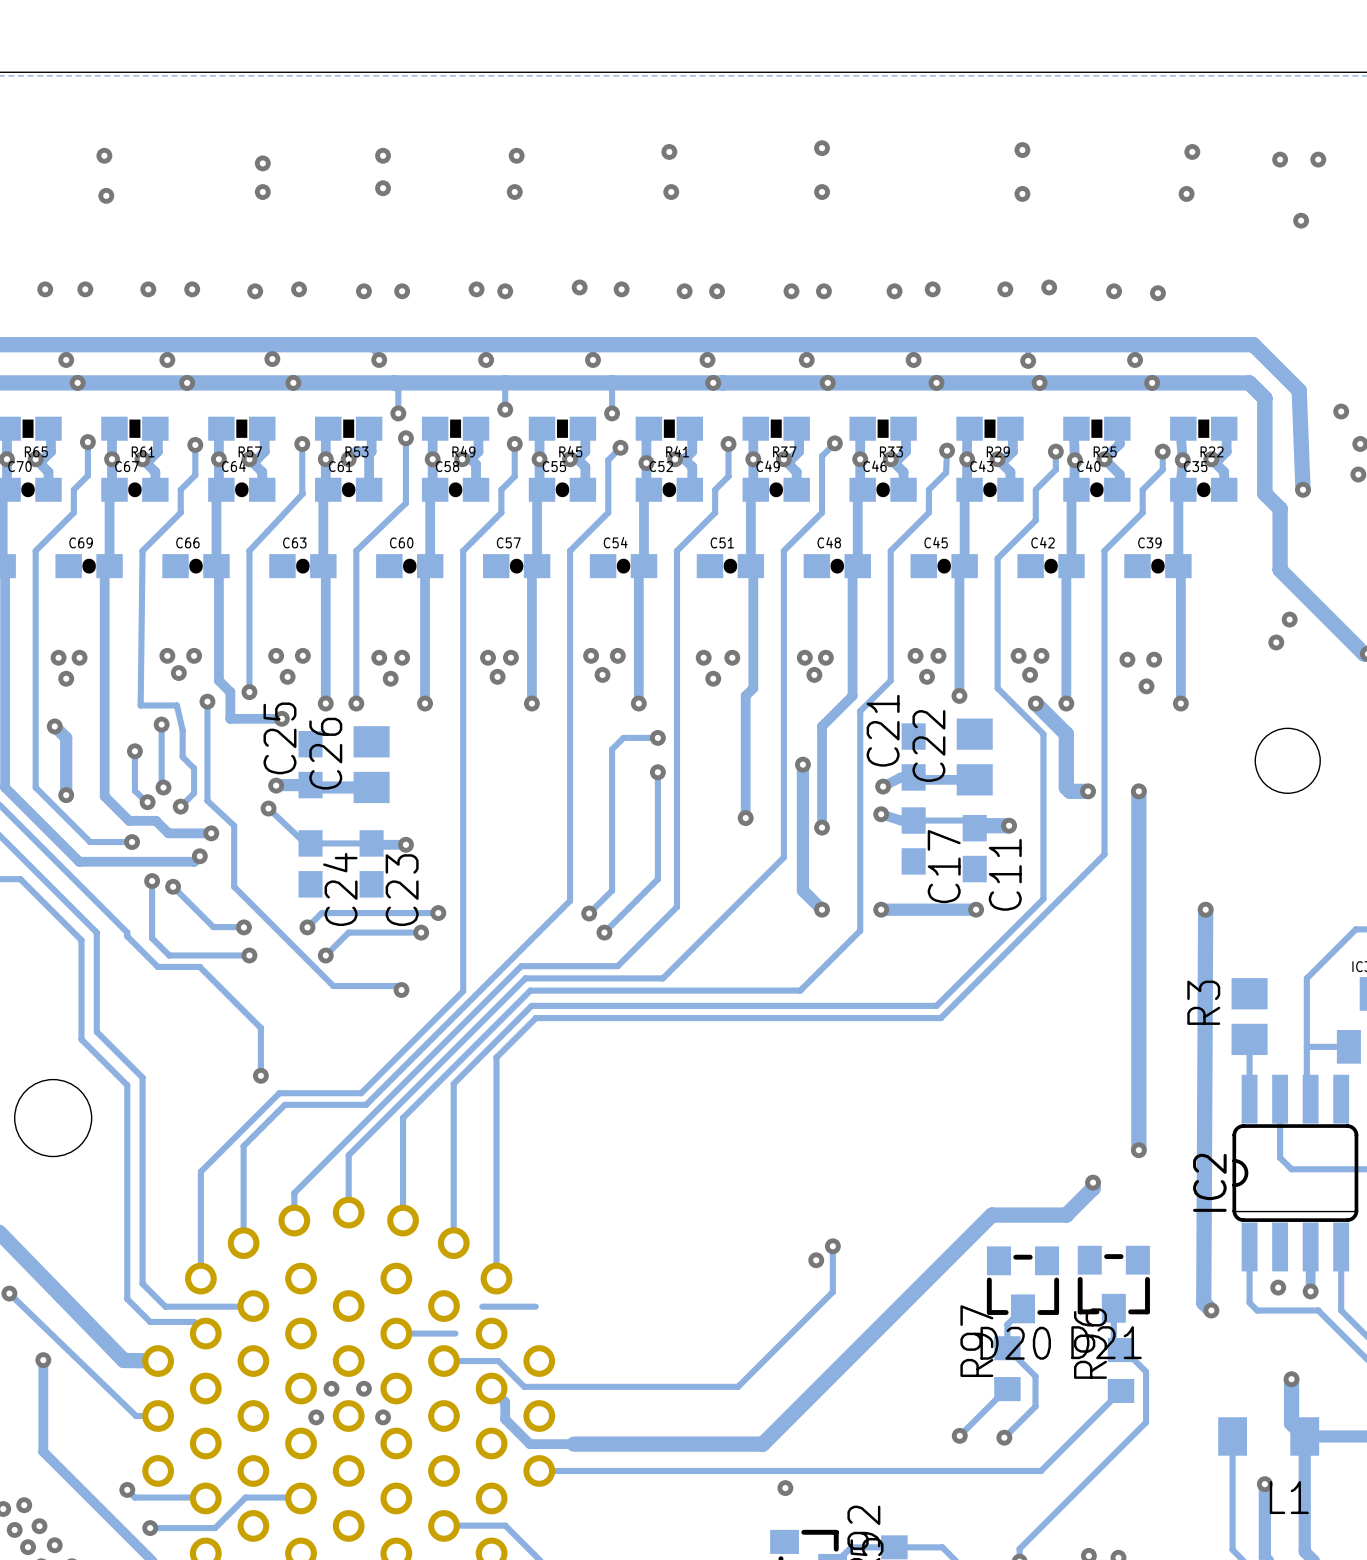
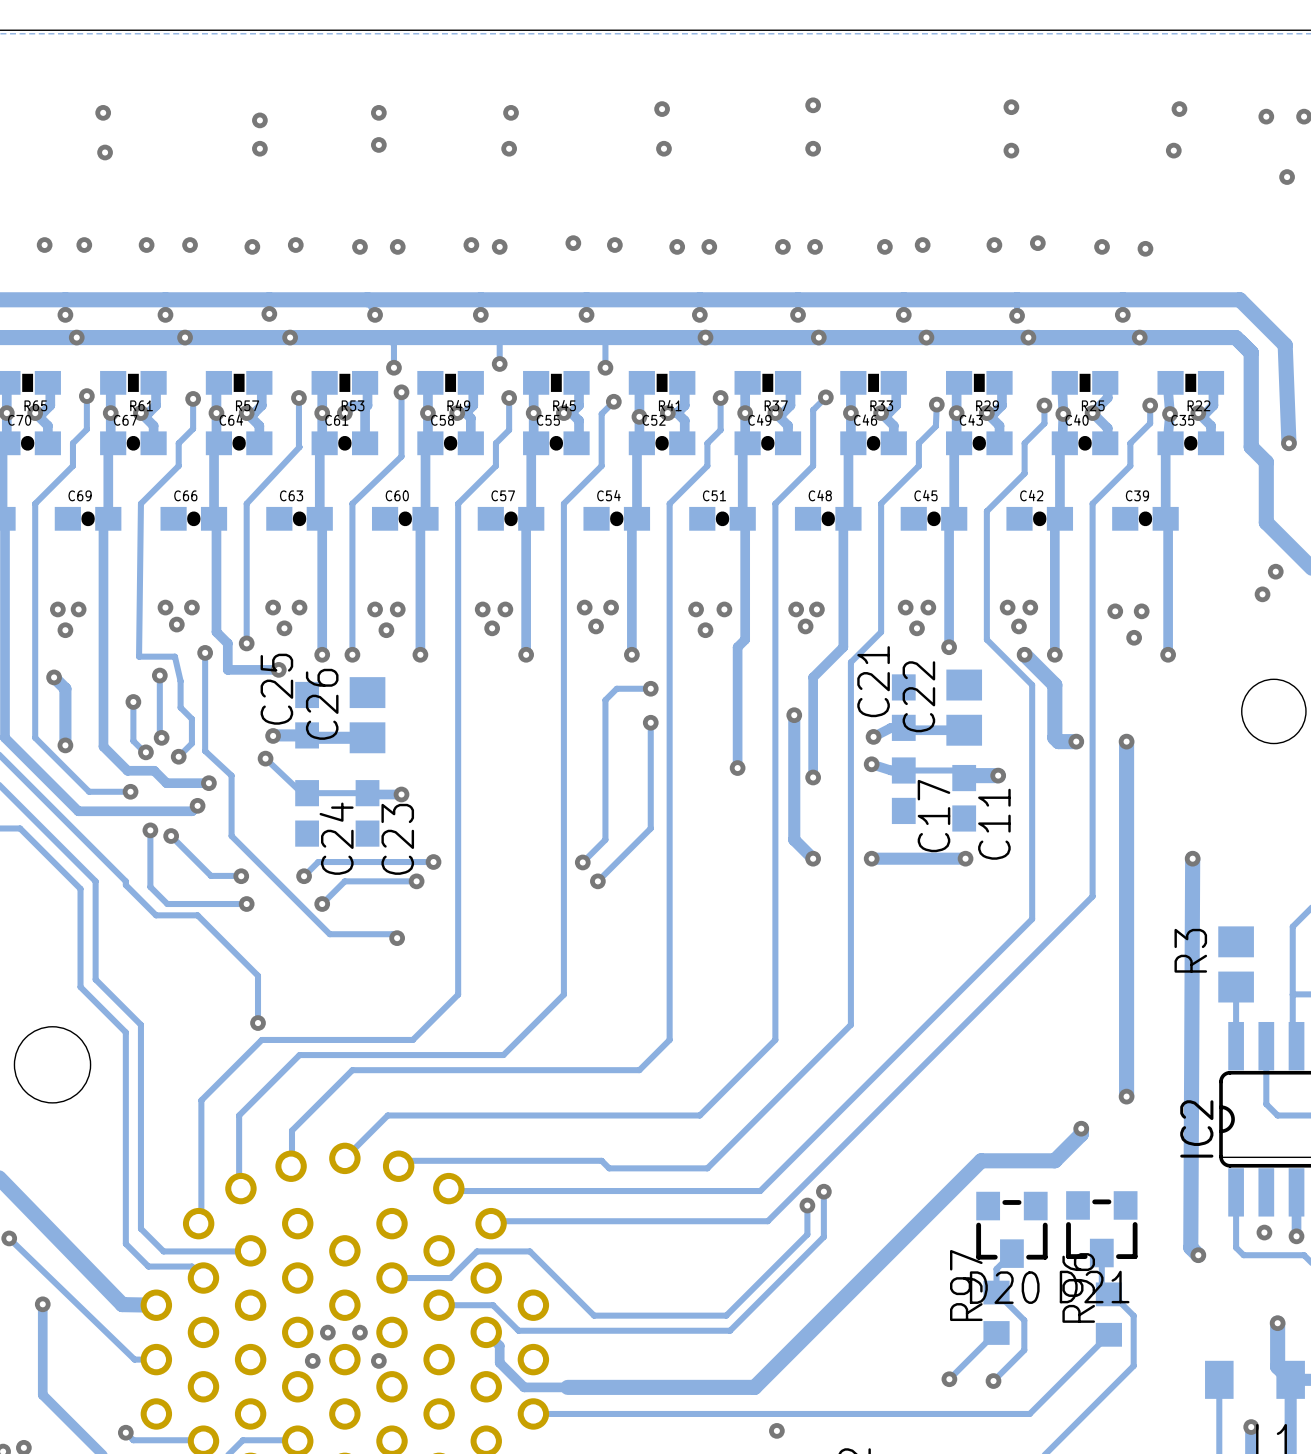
track: (1104, 854) (940, 1018) (535, 1018) (496, 1057) (496, 1278) -> (1092, 804) (1092, 896) (767, 1221) (493, 1221) (491, 1223)
track: (783, 857) (662, 978) (525, 978) (348, 1155) (348, 1212) -> (775, 807) (775, 1039) (699, 1115) (387, 1115) (344, 1158)
track: (1043, 899) (936, 1005) (531, 1005) (453, 1083) (453, 1243) -> (1032, 848) (1032, 919) (760, 1191) (451, 1191) (448, 1188)
track: (570, 900) (366, 1104) (284, 1104) (243, 1146) (243, 1243) -> (563, 849) (563, 994) (503, 1055) (299, 1055) (239, 1115) (239, 1186) (240, 1188)
track: (676, 906) (617, 966) (521, 966) (294, 1193) (294, 1220) -> (669, 855) (669, 1039) (639, 1070) (352, 1070) (292, 1130) (291, 1166)
track: (860, 930) (800, 990) (530, 990) (403, 1117) (403, 1220) -> (850, 879) (850, 1024) (707, 1168) (609, 1168) (601, 1160) (404, 1160) (398, 1166)
track: (463, 991) (361, 1093) (279, 1093) (200, 1171) (200, 1278) -> (458, 939) (458, 994) (412, 1039) (261, 1039) (201, 1100) (201, 1220) (198, 1223)
track: none -> (807, 1205) (807, 1234) (726, 1315) (594, 1315) (529, 1251)
track: none -> (477, 1251) (450, 1278)

